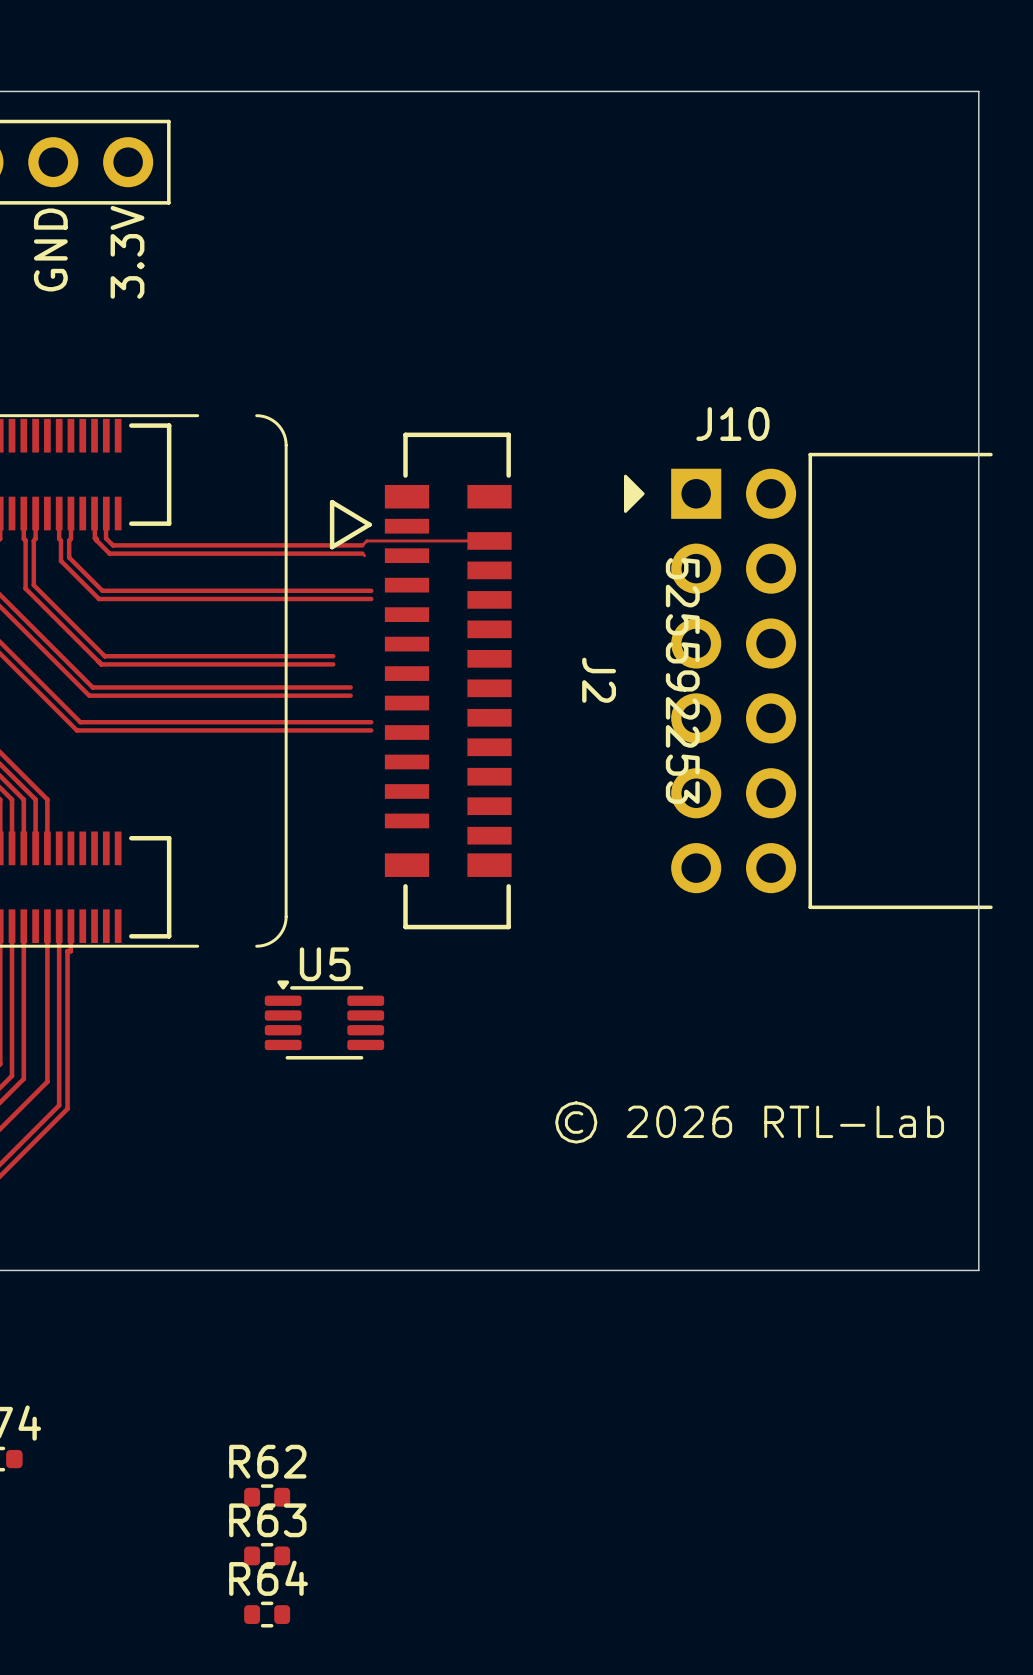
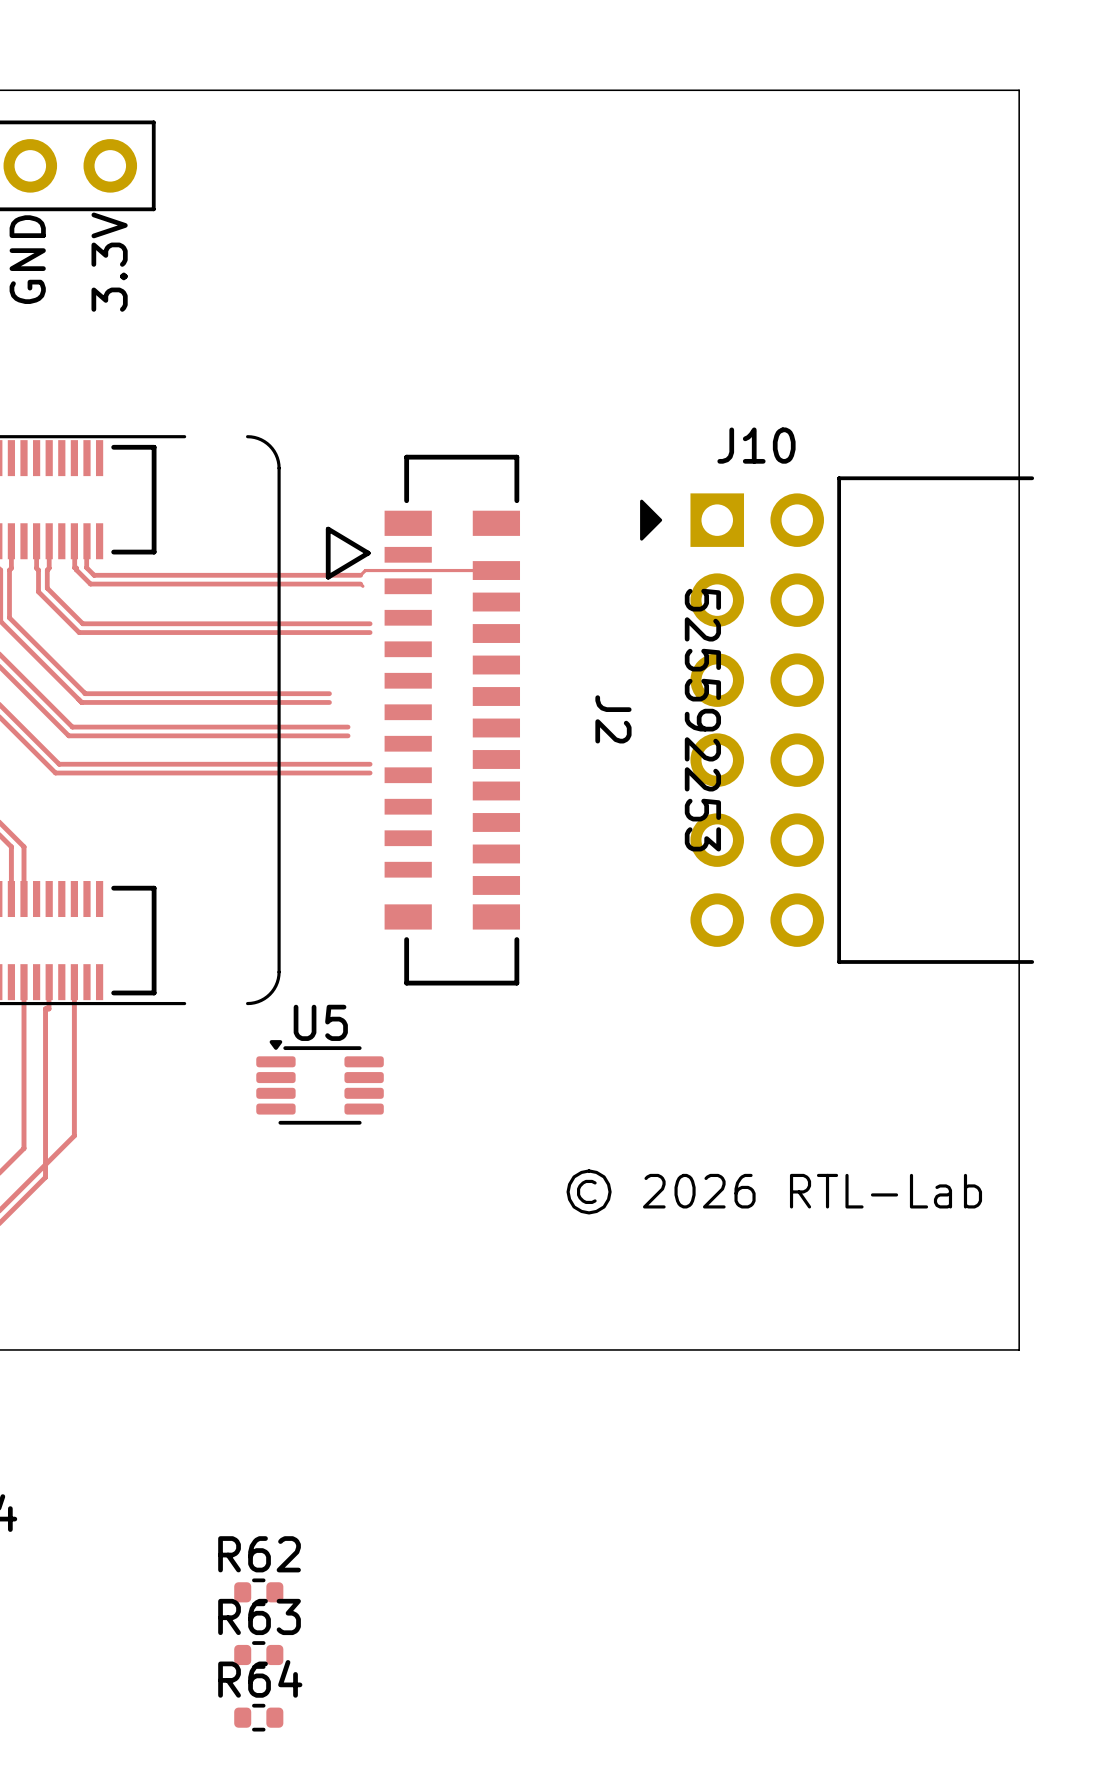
track: (59, 926) (59, 1105) -> (74, 982) (74, 1135) (36, 1173)

